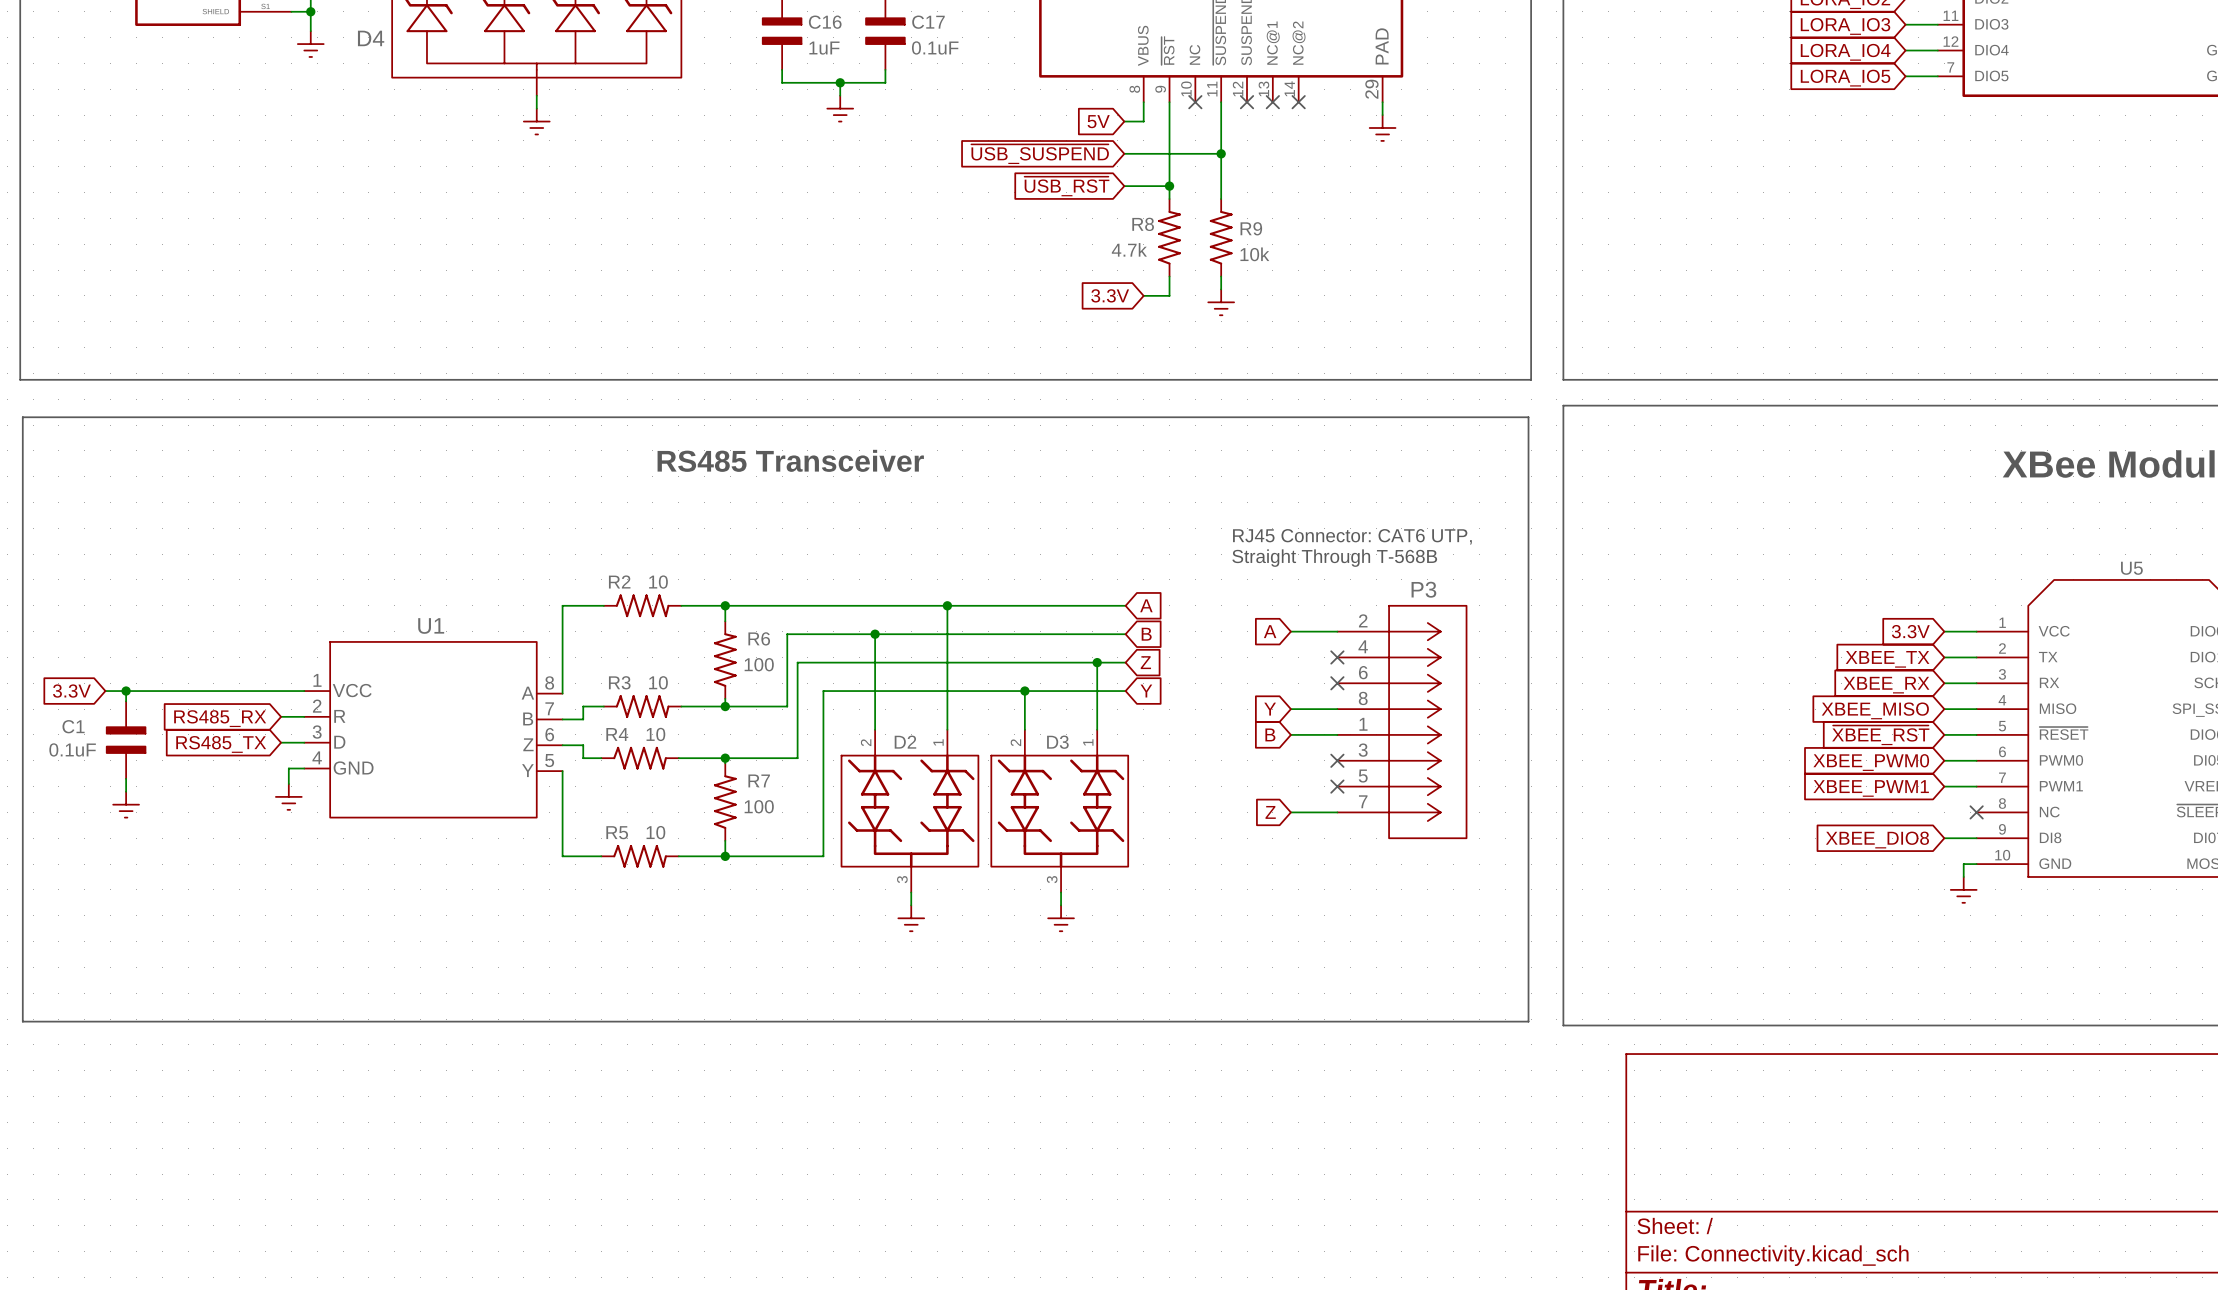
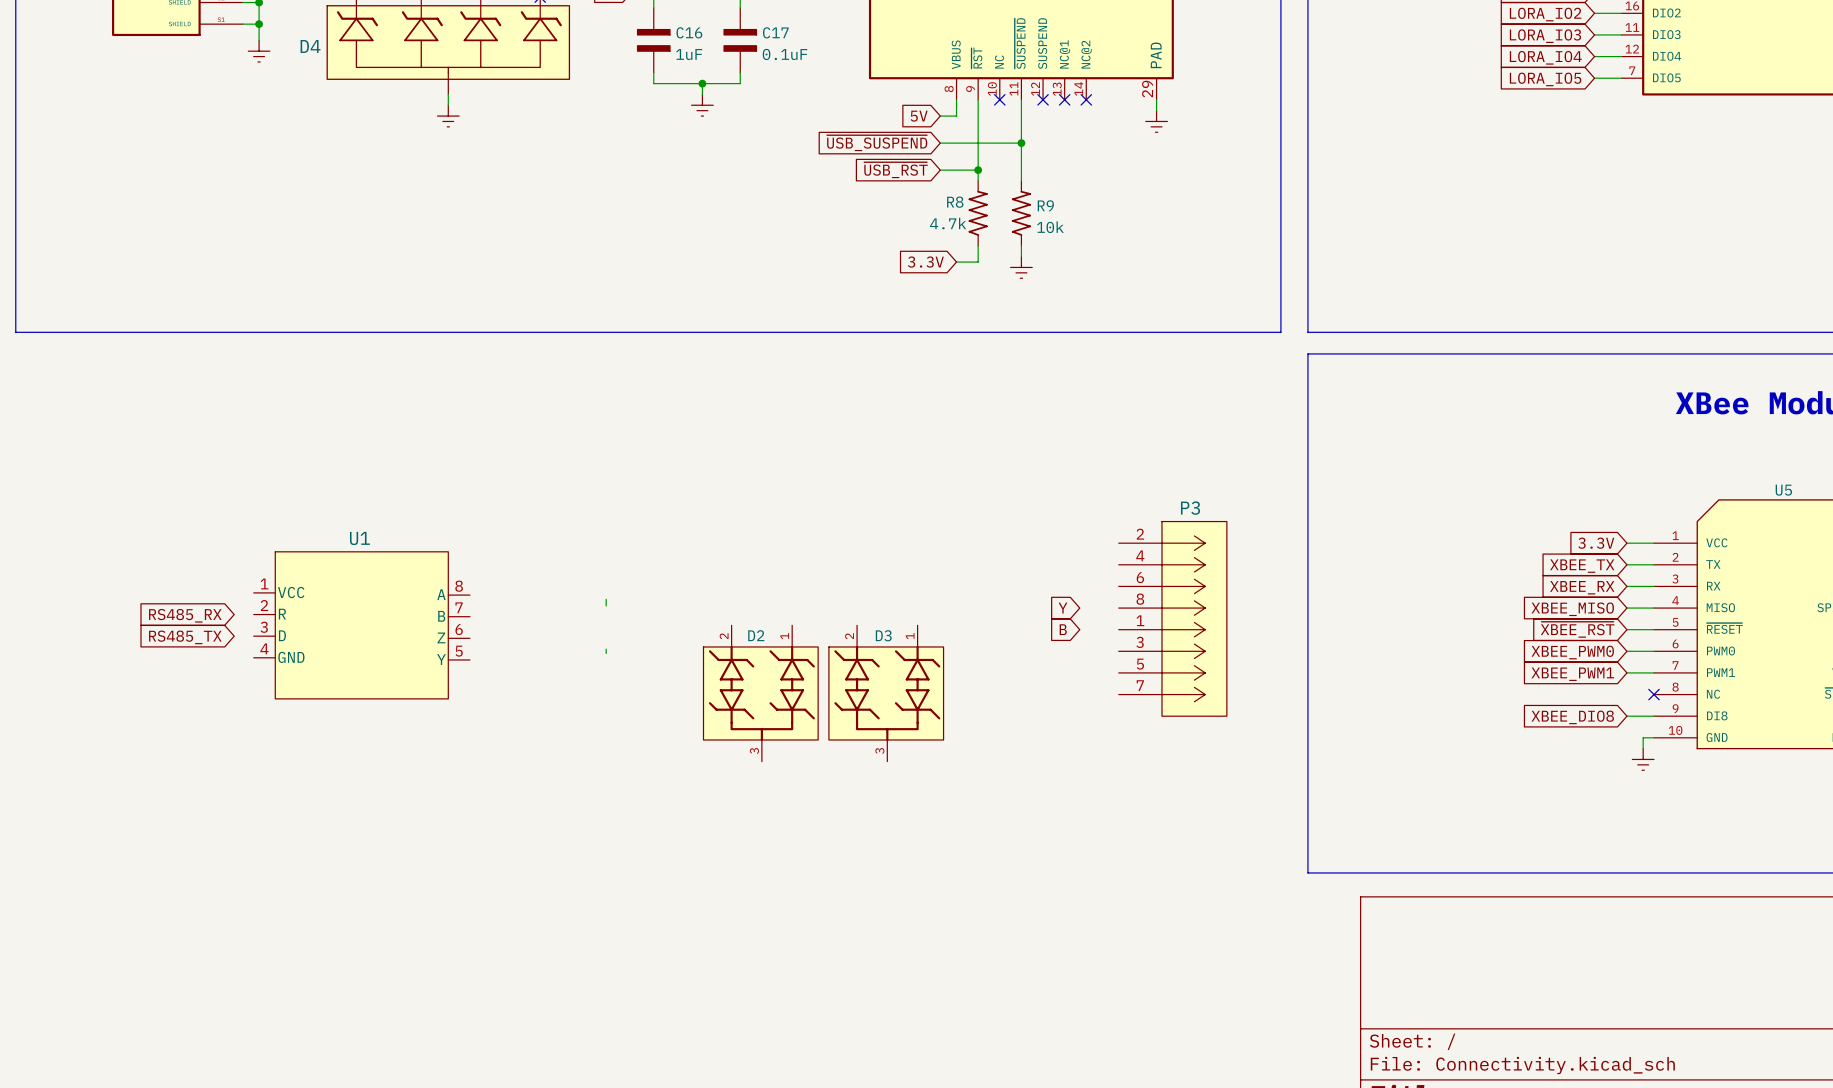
line: (22, 417) (1528, 417) (1528, 1021) (22, 1021) (22, 417) -> none
text: RS485 Transceiver (790, 460) -> none
text: RJ45 Connector: CAT6 UTP, (1352, 536) -> none
text: Straight Through T-568B (1334, 558) -> none
wire: (603, 605) (562, 605) (562, 693) -> none
R2: 10 (642, 605) -> none
wire: (681, 605) (1125, 605) -> none
wire: (725, 605) (725, 621) -> none
junction: (725, 605) -> none
wire: (947, 605) (947, 729) -> none
junction: (947, 605) -> none
global label: A (1146, 605) -> none
global label: A (1270, 631) -> none
wire: (1290, 631) (1337, 631) -> none
wire: (875, 634) (875, 729) -> none
junction: (875, 634) -> none
wire: (1125, 634) (787, 634) (787, 706) (681, 706) -> none
global label: B (1146, 634) -> none
no-connect mark: (1337, 657) -> none
R6: 100 (725, 660) -> none
wire: (1097, 662) (1097, 729) -> none
junction: (1097, 662) -> none
wire: (1125, 662) (797, 662) (797, 758) (678, 758) -> none
global label: Z (1145, 662) -> none
no-connect mark: (1337, 683) -> none
global label: 3.3V (71, 691) -> none
wire: (105, 691) (304, 691) -> none
wire: (126, 691) (126, 701) -> none
junction: (126, 691) -> none
wire: (1024, 691) (1024, 729) -> none
junction: (1024, 691) -> none
wire: (1125, 691) (823, 691) (823, 856) (678, 856) -> none
global label: Y (1146, 691) -> none
wire: (603, 706) (583, 706) (583, 719) (562, 719) -> none
R3: 10 (642, 706) -> none
junction: (725, 706) -> none
wire: (1290, 709) (1337, 709) -> none
wire: (281, 716) (304, 716) -> none
wire: (1290, 734) (1337, 734) -> none
C1: 0.1uF (126, 740) -> none
wire: (281, 742) (304, 742) -> none
wire: (562, 745) (583, 745) (583, 758) (601, 758) -> none
R4: 10 (640, 758) -> none
junction: (725, 758) -> none
no-connect mark: (1337, 760) -> none
wire: (304, 768) (288, 768) (288, 784) -> none
wire: (562, 771) (562, 856) (601, 856) -> none
wire: (126, 778) (126, 791) -> none
no-connect mark: (1337, 786) -> none
power symbol: (288, 796) -> none
R7: 100 (725, 802) -> none
power symbol: (126, 804) -> none
global label: Z (1270, 812) -> none
wire: (1290, 812) (1337, 812) -> none
wire: (725, 840) (725, 856) -> none
R5: 10 (640, 856) -> none
junction: (725, 856) -> none
wire: (911, 892) (911, 905) -> none
wire: (1061, 892) (1061, 905) -> none
power symbol: (911, 918) -> none
power symbol: (1061, 918) -> none

